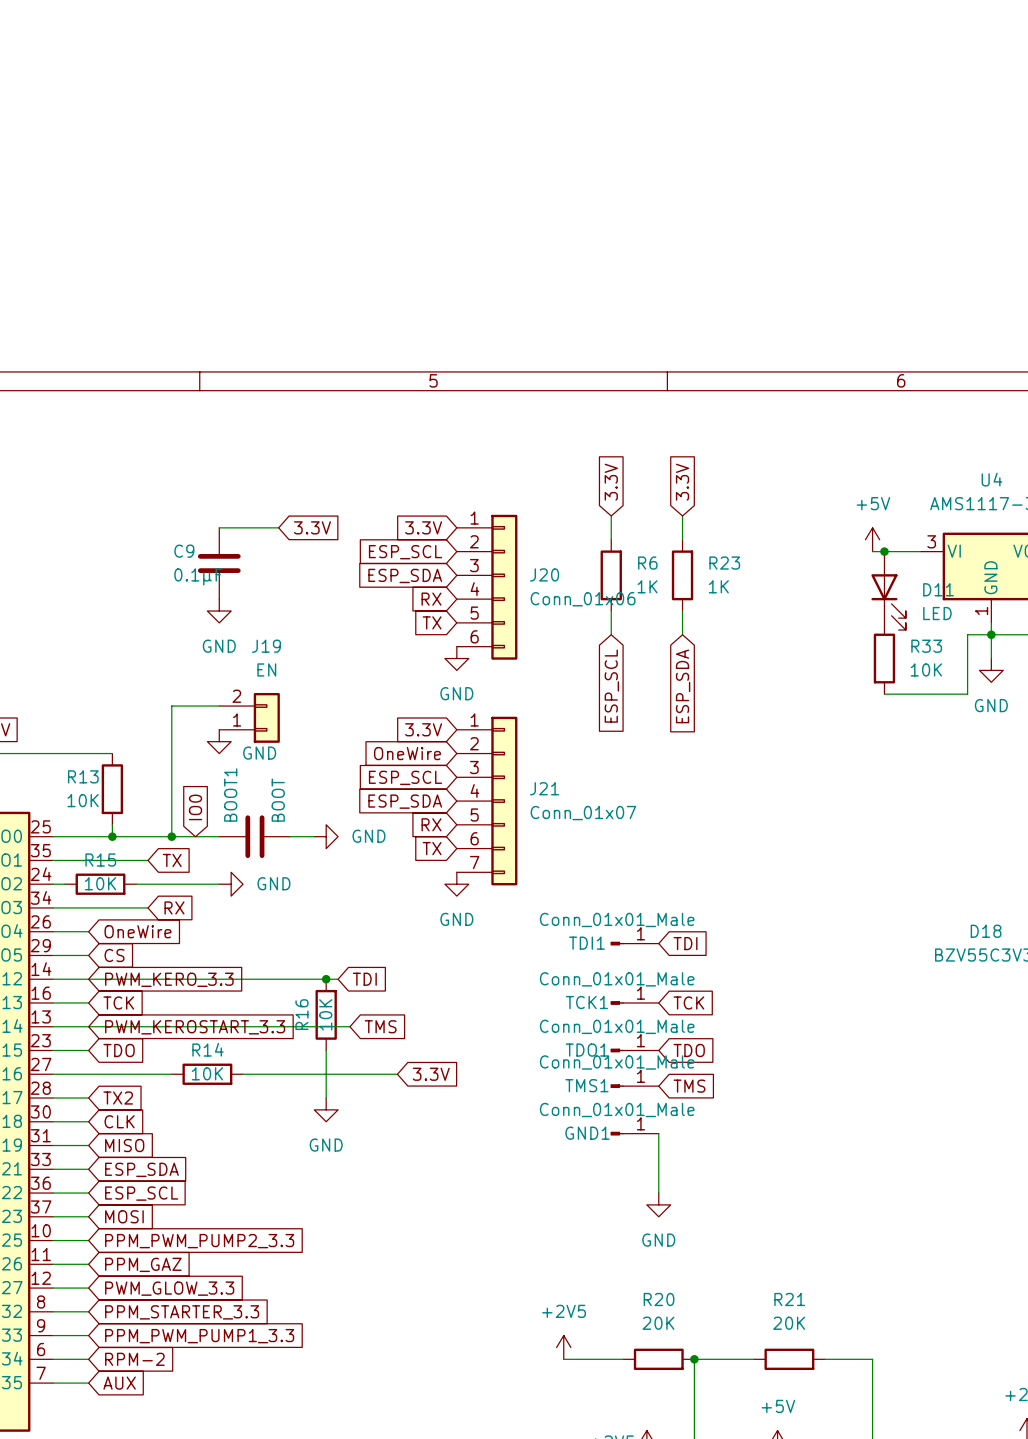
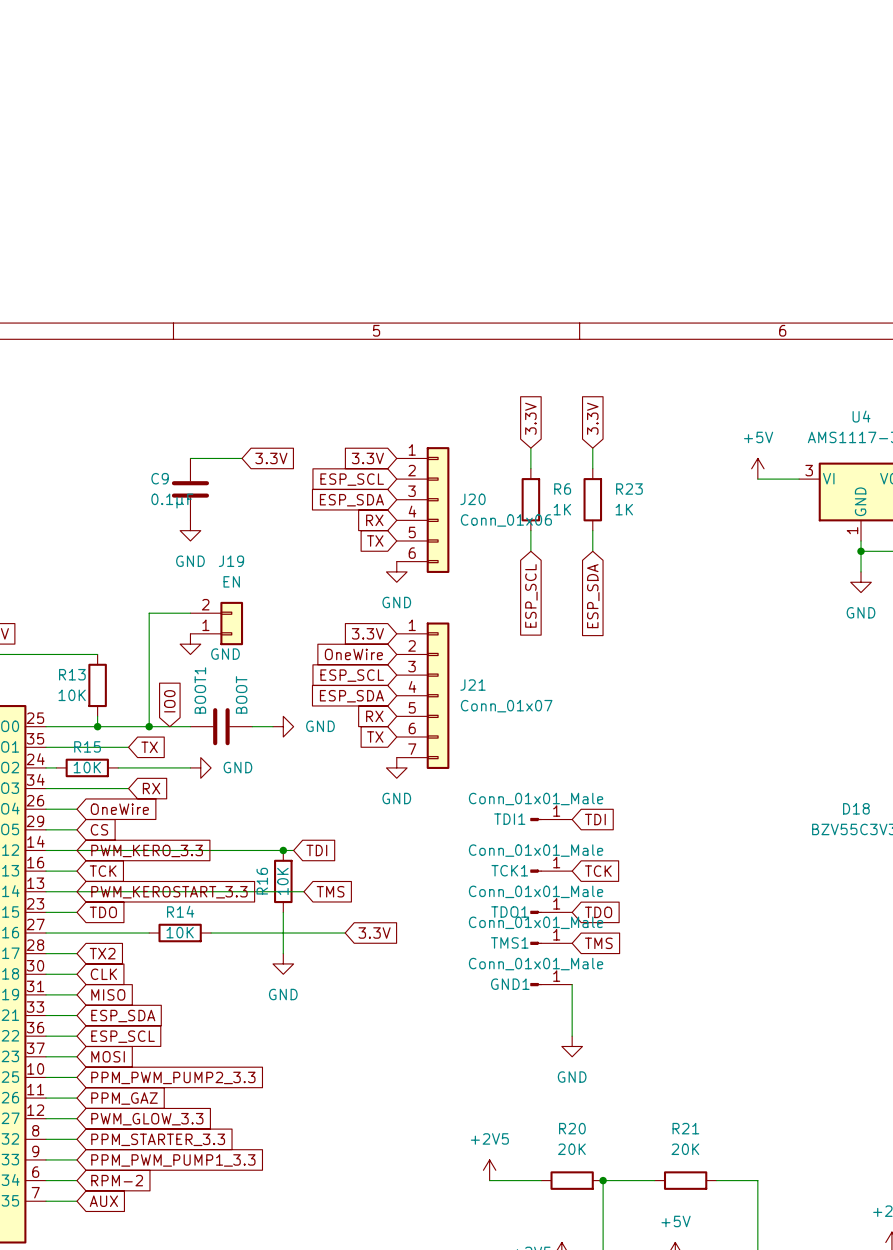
junction: (884, 551) -> none
D11: LED (888, 590) -> none
wire: (991, 634) (967, 634) (967, 694) (884, 694) -> none
R33: 10K (884, 658) -> none

